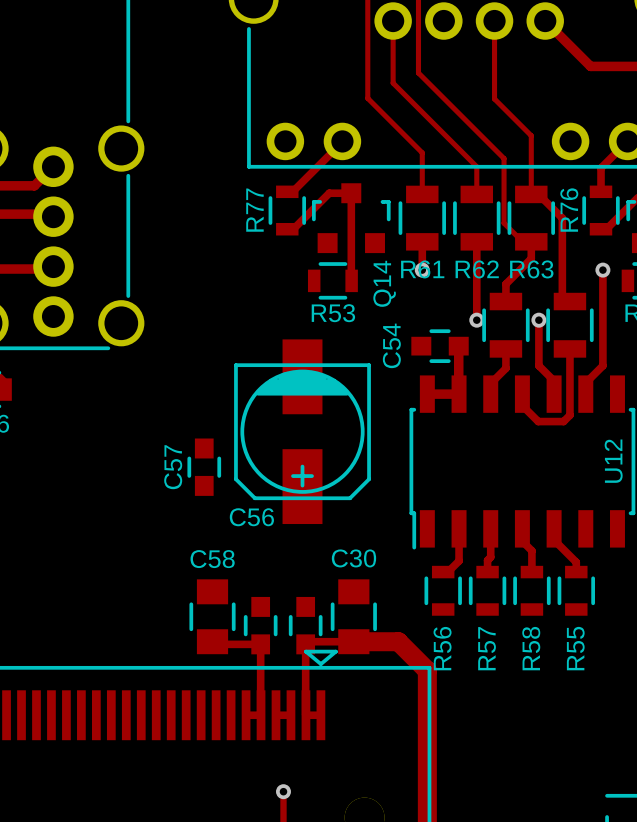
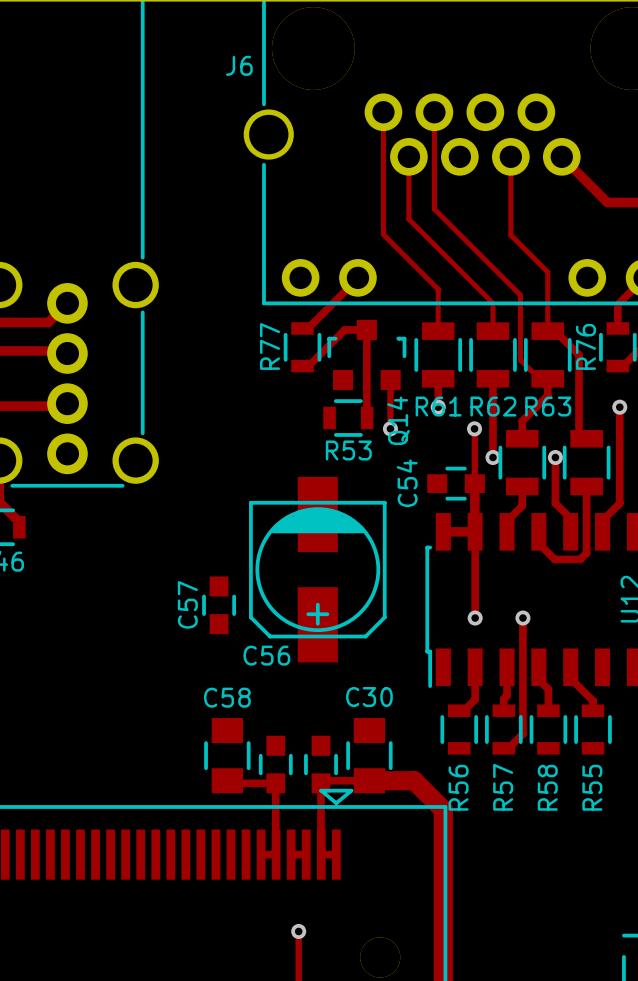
track: none -> (390, 380) (390, 428)
via: none -> (390, 428)
track: none -> (474, 429) (474, 483)
via: none -> (474, 428)
track: none -> (475, 531) (475, 618)
via: none -> (475, 618)
track: none -> (522, 618) (522, 733) (508, 748) (503, 748)
via: none -> (522, 618)

